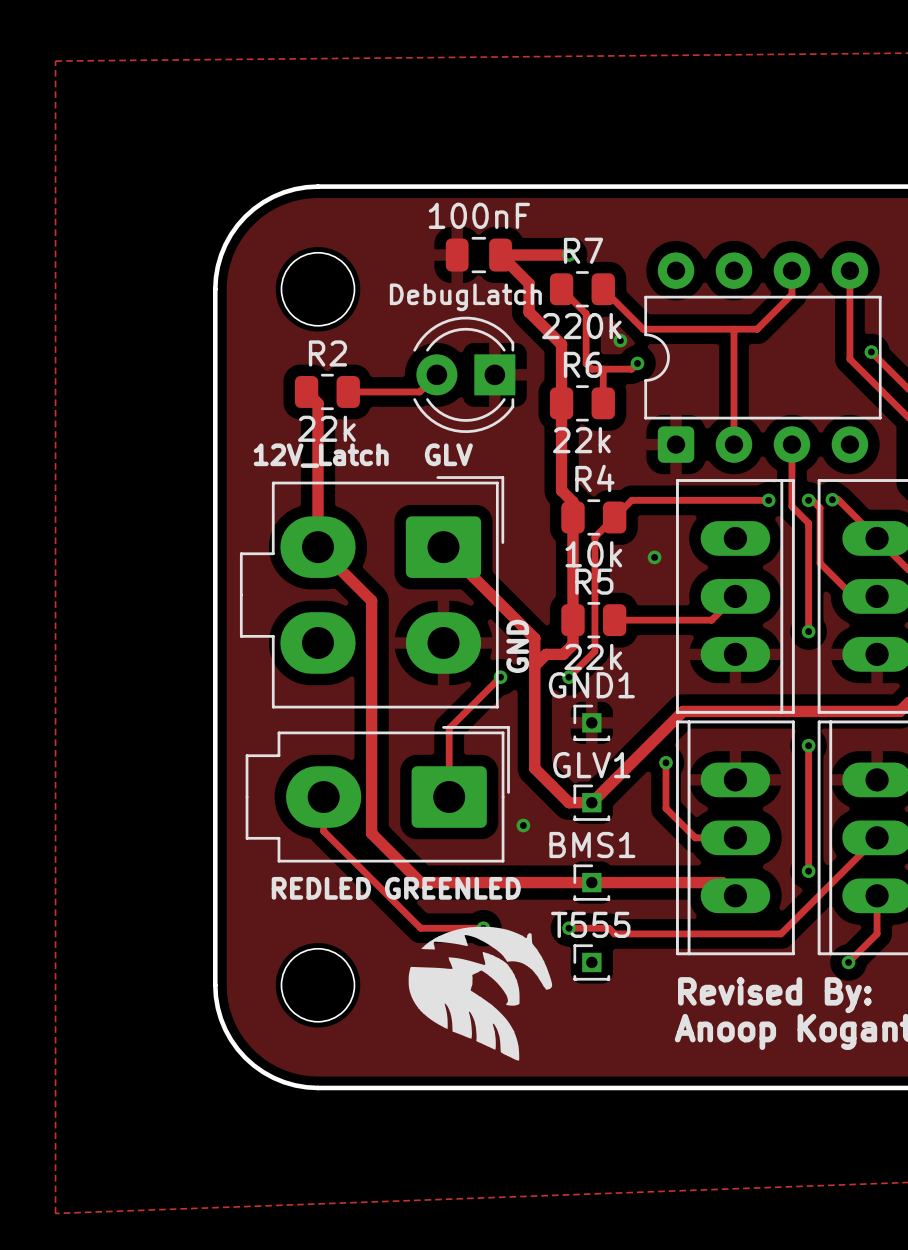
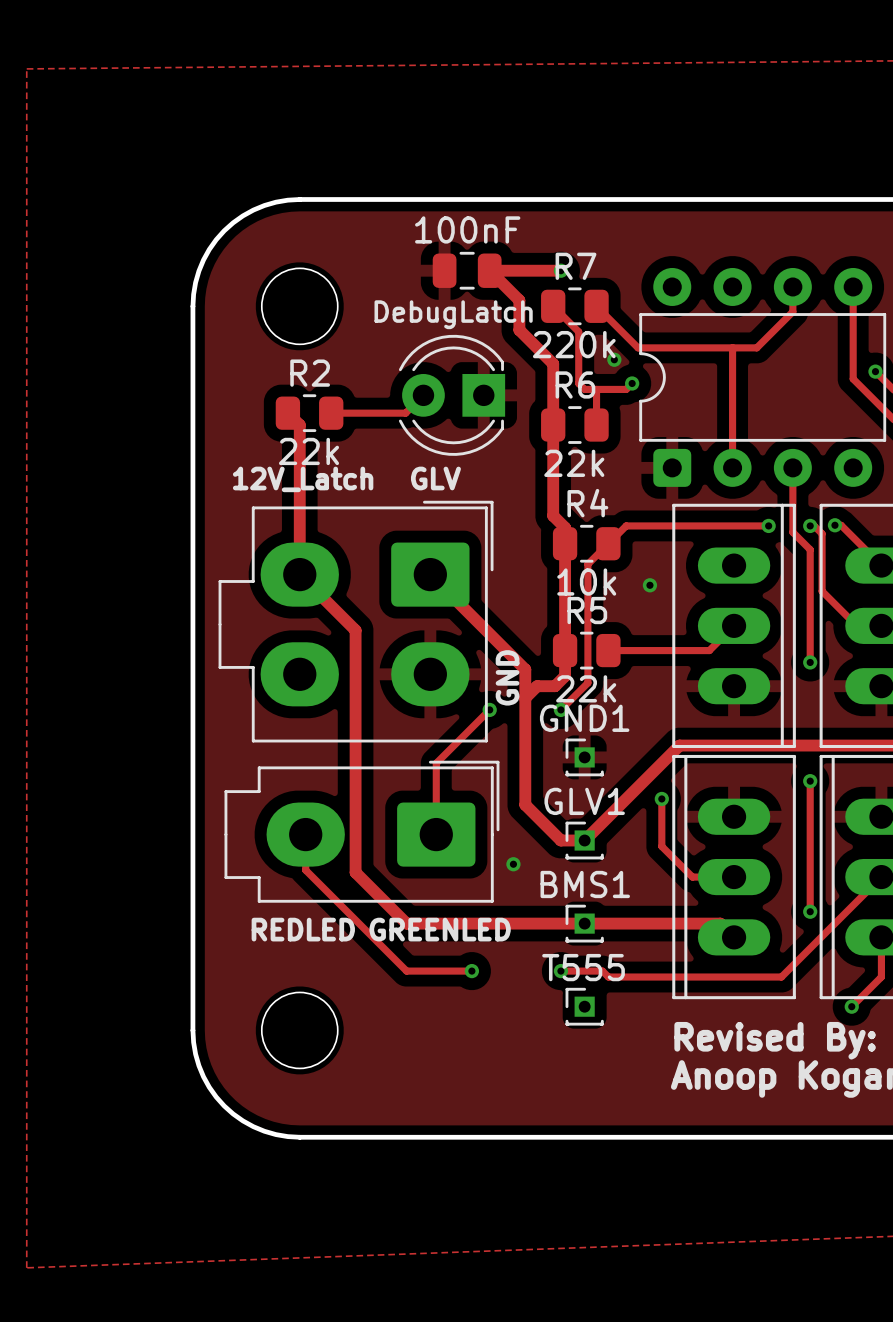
drawing: [408, 926, 553, 1061] -> none

